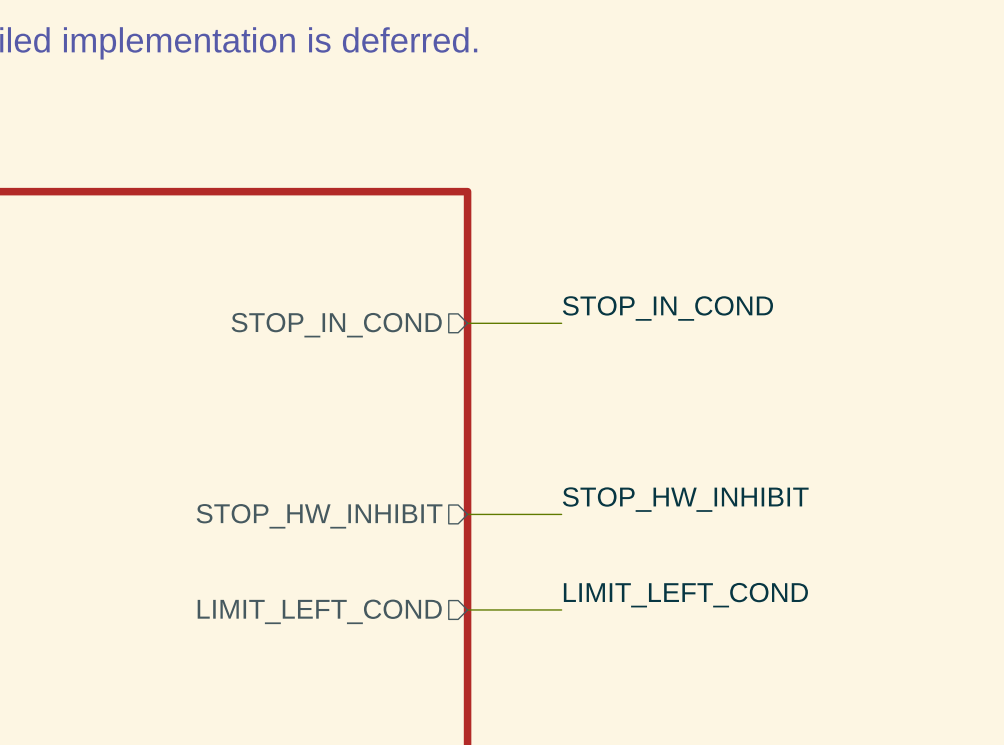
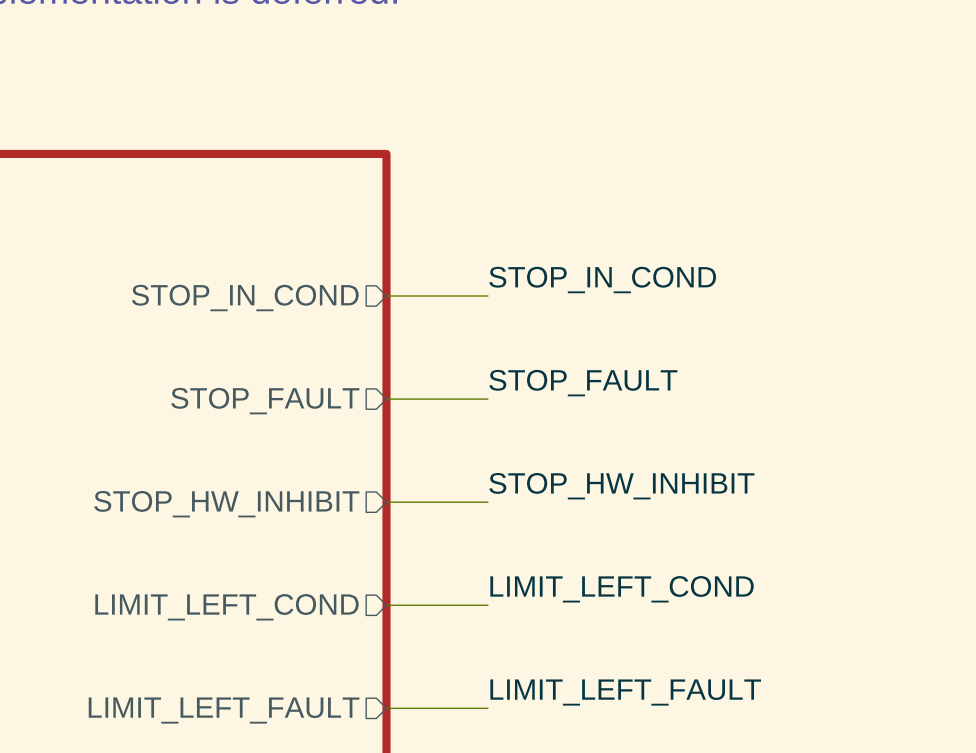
label: none -> STOP_FAULT (583, 383)
wire: none -> (386, 399) (487, 399)
sheet pin: none -> STOP_FAULT (265, 401)
label: none -> LIMIT_LEFT_FAULT (625, 692)
wire: none -> (386, 708) (487, 708)
sheet pin: none -> LIMIT_LEFT_FAULT (224, 710)

